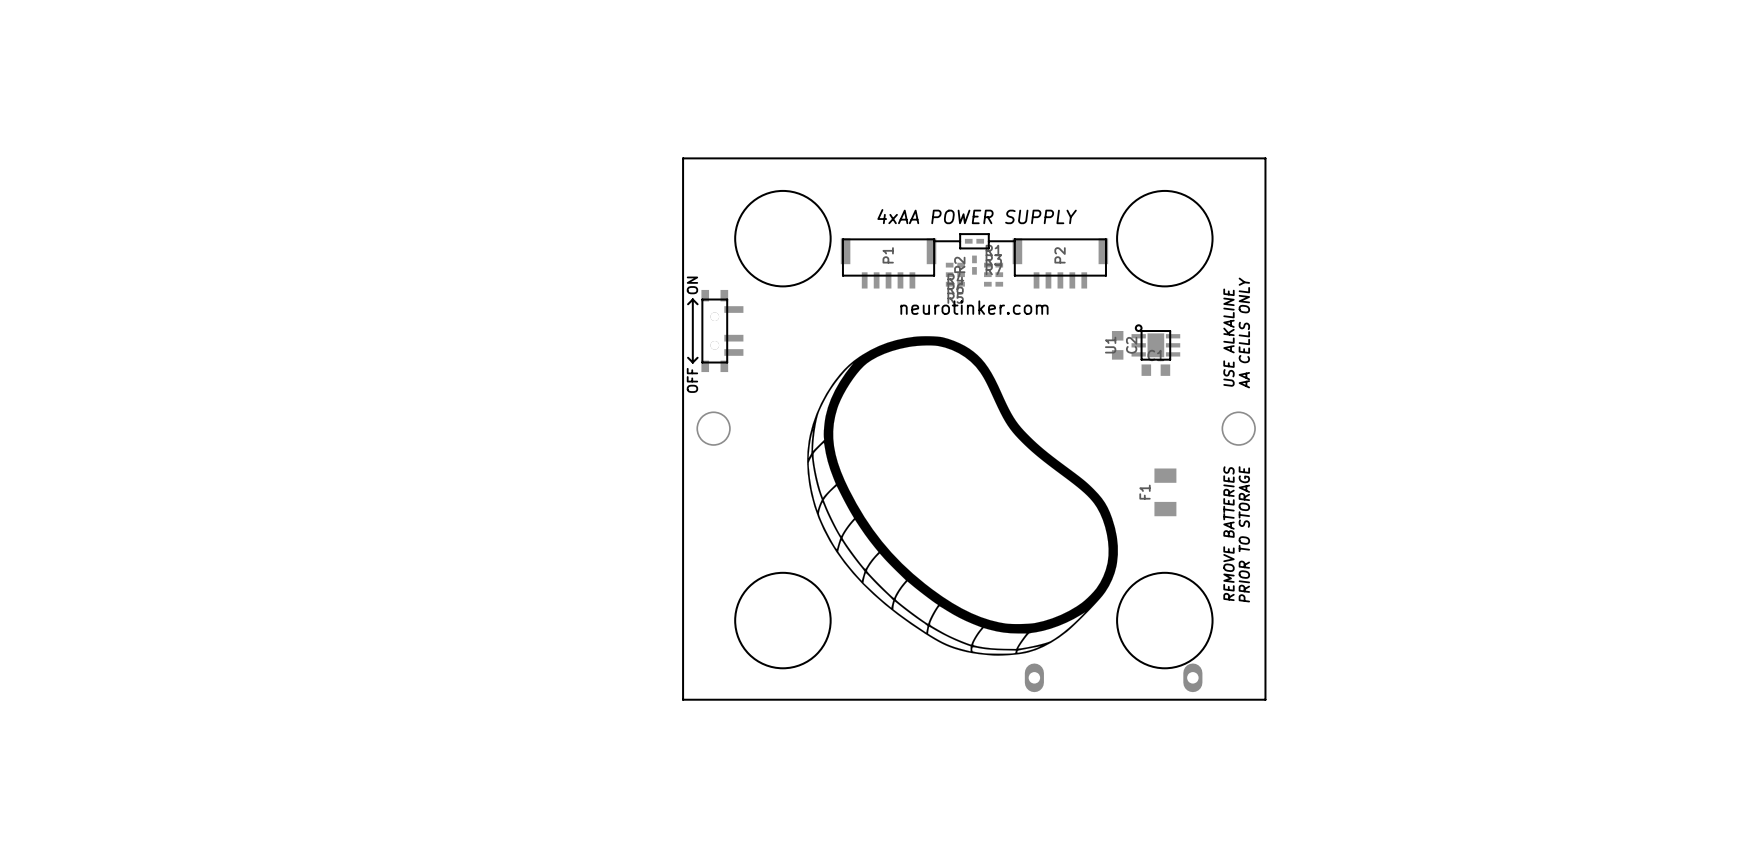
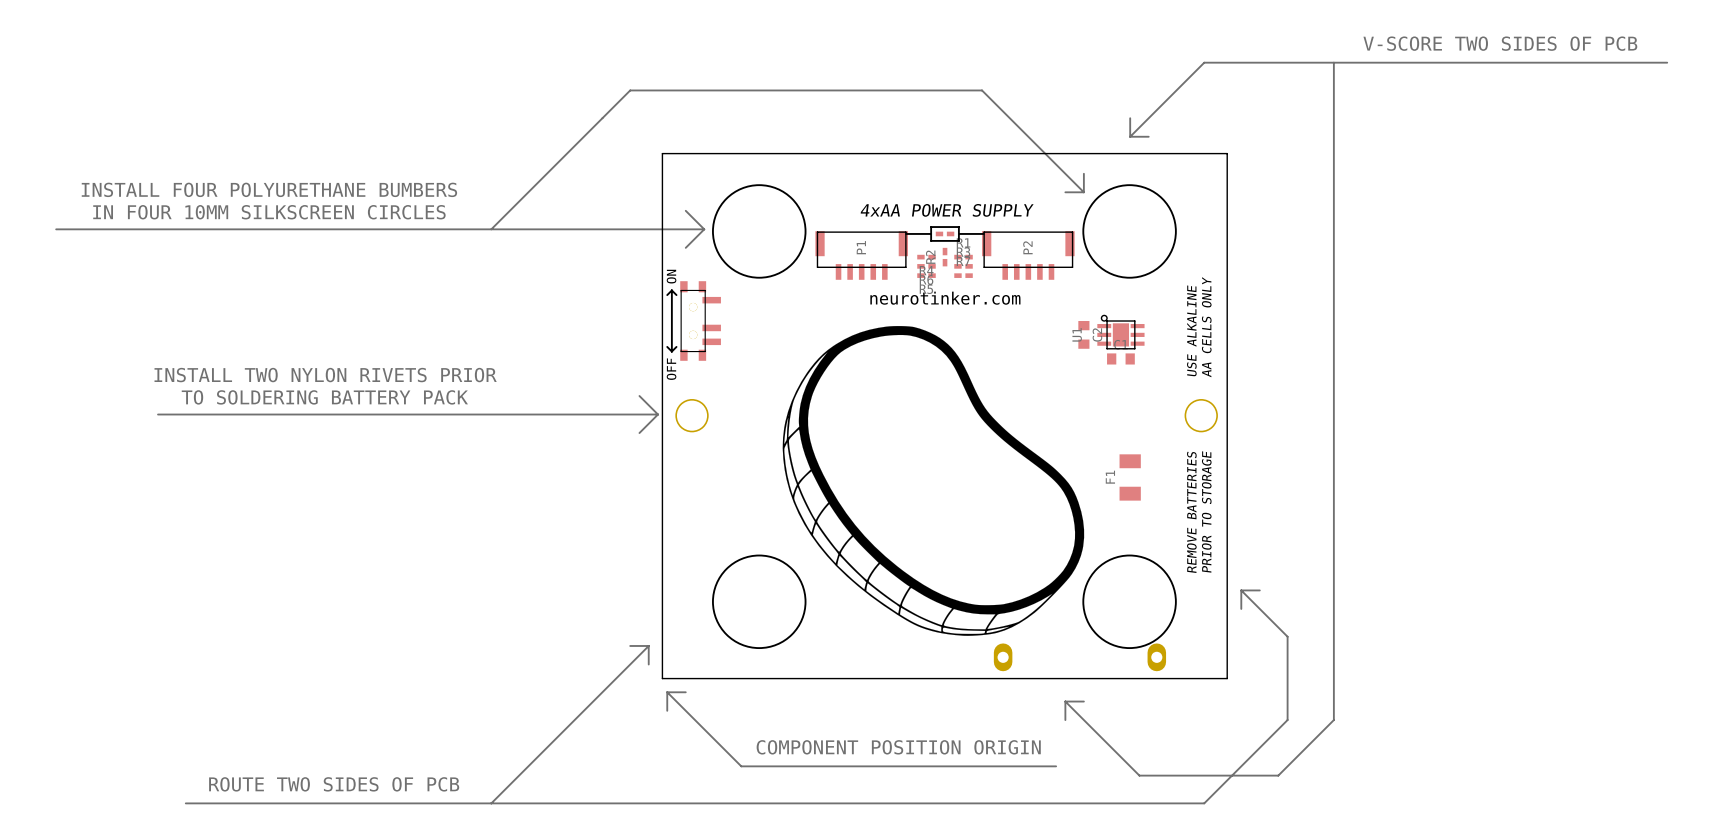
text: none -> V-SCORE TWO SIDES OF PCB (1500, 43)
line: none -> (1333, 62) (1333, 720) (1278, 775) (1139, 775) (1065, 701)
line: none -> (1667, 62) (1204, 62) (1130, 136)
line: none -> (1130, 118) (1130, 136)
line: none -> (1130, 136) (1148, 136)
line: none -> (1083, 173) (1083, 192)
text: none -> INSTALL FOUR POLYURETHANE BUMBERS (269, 189)
line: none -> (1065, 192) (1083, 192)
line: none -> (1083, 192) (982, 90) (630, 90) (491, 229)
line: none -> (685, 210) (704, 229)
text: none -> IN FOUR 10MM SILKSCREEN CIRCLES (269, 212)
line: none -> (56, 229) (704, 229)
line: none -> (704, 229) (685, 247)
text: none -> INSTALL TWO NYLON RIVETS PRIOR (325, 375)
line: none -> (639, 396) (657, 414)
text: none -> TO SOLDERING BATTERY PACK (324, 397)
line: none -> (158, 414) (657, 414)
line: none -> (657, 414) (639, 433)
line: none -> (1241, 590) (1259, 590)
line: none -> (1241, 590) (1241, 608)
line: none -> (1241, 590) (1287, 636) (1287, 720) (1204, 803) (185, 803)
line: none -> (630, 645) (648, 645)
line: none -> (648, 645) (648, 664)
line: none -> (648, 645) (491, 803)
line: none -> (667, 692) (685, 692)
line: none -> (667, 692) (667, 710)
line: none -> (667, 692) (741, 766) (1056, 766)
line: none -> (1065, 701) (1083, 701)
line: none -> (1065, 701) (1065, 720)
text: none -> COMPONENT POSITION ORIGIN (898, 747)
text: none -> ROUTE TWO SIDES OF PCB (334, 784)

